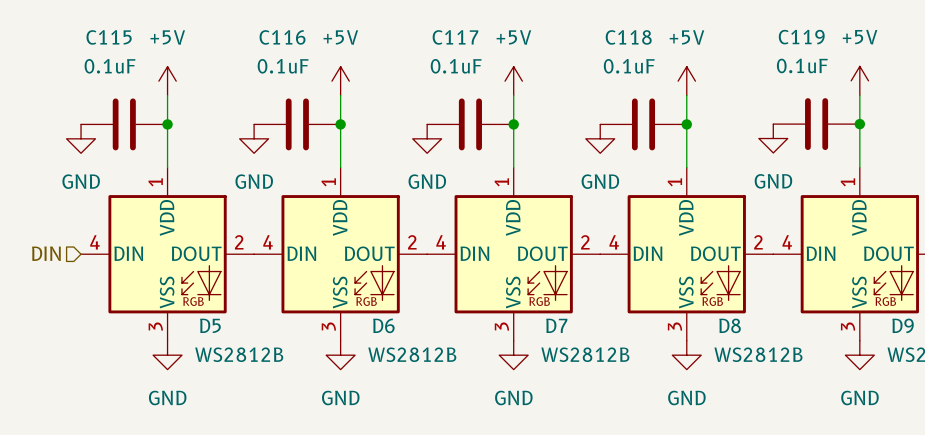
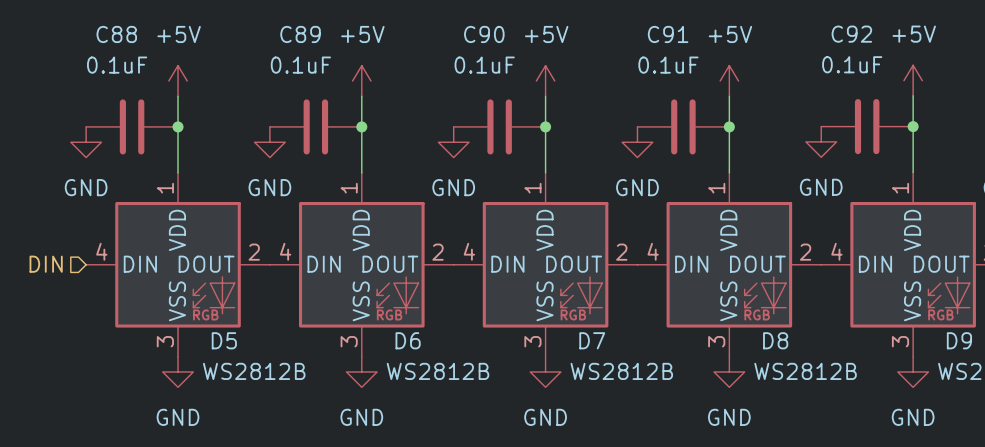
C115 name: C115 (109, 37) -> C88 (116, 34)
C116 name: C116 (282, 37) -> C89 (300, 34)
C117 name: C117 (455, 37) -> C90 (484, 34)
C118 name: C118 (628, 37) -> C91 (668, 34)
C119 name: C119 (801, 37) -> C92 (851, 34)

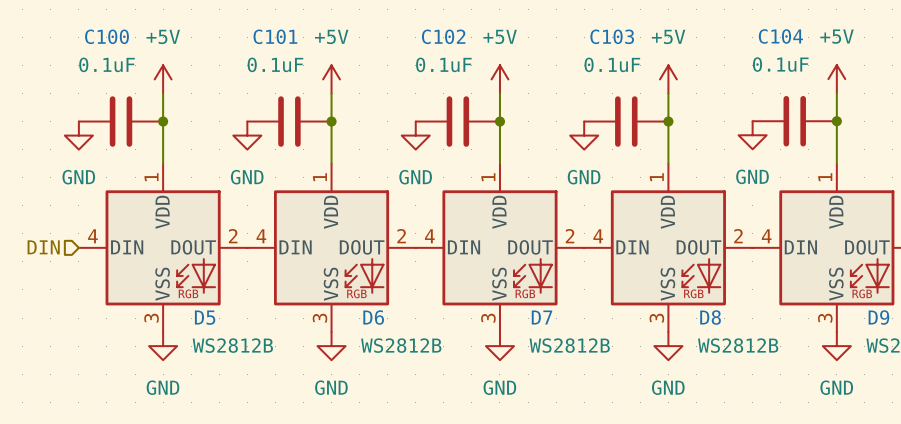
C88 name: C88 (116, 34) -> C100 (106, 36)
C89 name: C89 (300, 34) -> C101 (275, 36)
C90 name: C90 (484, 34) -> C102 (443, 36)
C91 name: C91 (668, 34) -> C103 (612, 36)
C92 name: C92 (851, 34) -> C104 (780, 36)

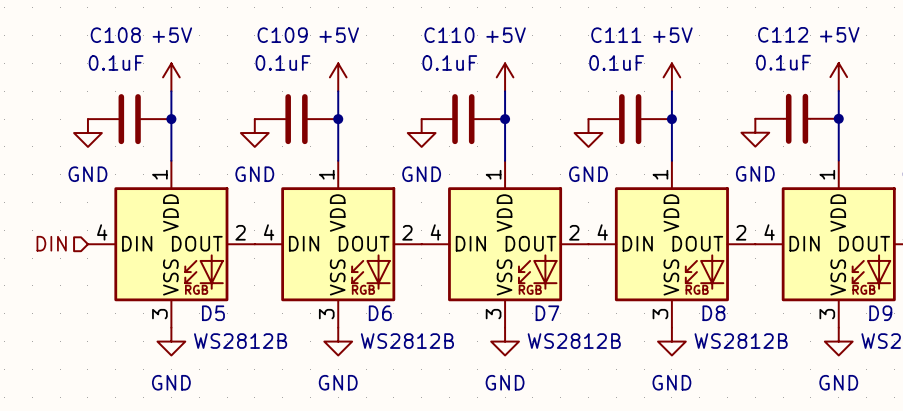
C100 name: C100 (106, 36) -> C108 (115, 35)
C101 name: C101 (275, 36) -> C109 (282, 35)
C102 name: C102 (443, 36) -> C110 (449, 35)
C103 name: C103 (612, 36) -> C111 (616, 35)
C104 name: C104 (780, 36) -> C112 (783, 34)

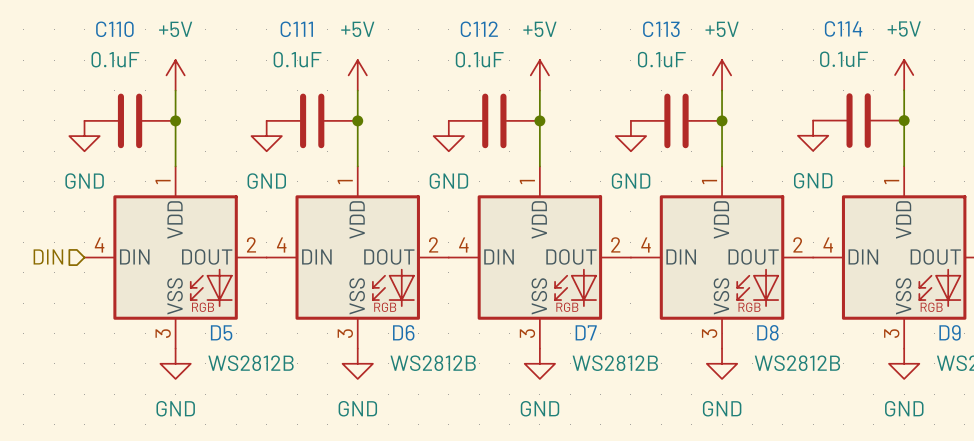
C112 name: C112 (783, 34) -> C114 (843, 28)
C108 name: C108 (115, 35) -> C110 (114, 29)
C109 name: C109 (282, 35) -> C111 (296, 29)
C110 name: C110 (449, 35) -> C112 (479, 29)
C111 name: C111 (616, 35) -> C113 (661, 29)

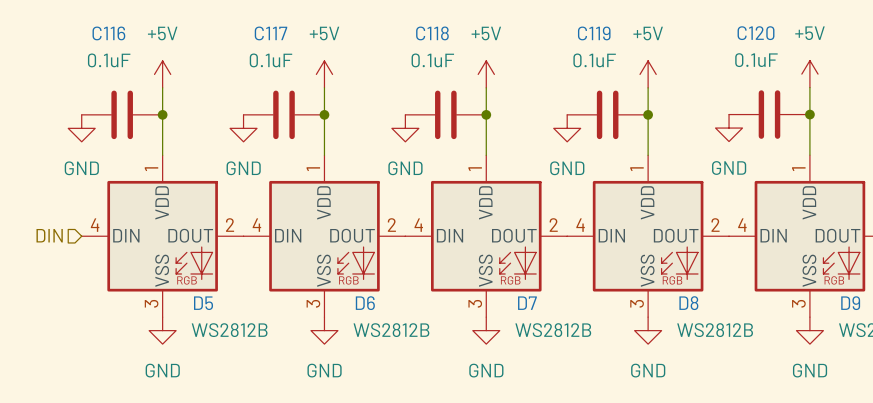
C114 name: C114 (843, 28) -> C120 (756, 33)
C110 name: C110 (114, 29) -> C116 (108, 33)
C111 name: C111 (296, 29) -> C117 (270, 33)
C112 name: C112 (479, 29) -> C118 (432, 33)
C113 name: C113 (661, 29) -> C119 (594, 33)

